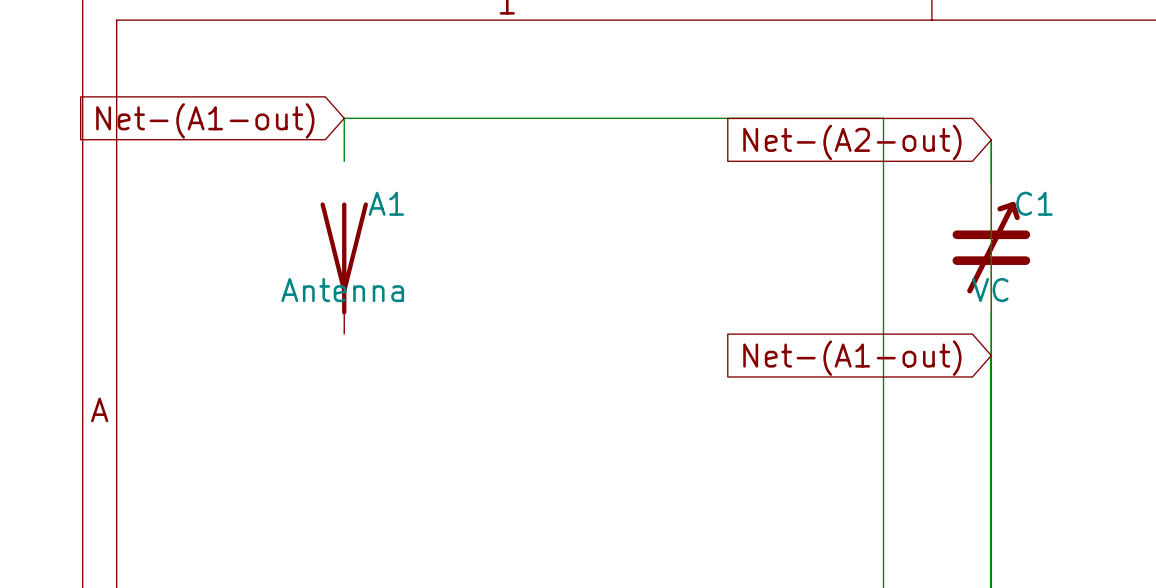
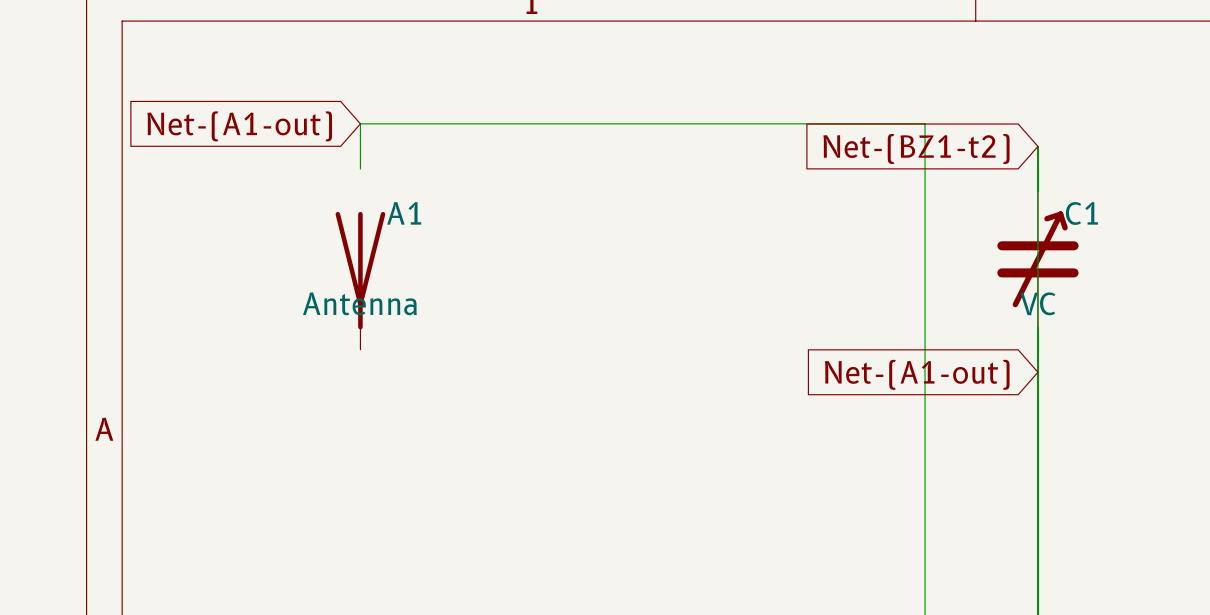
global label: Net-(A2-out) (852, 142) -> Net-(BZ1-t2) (916, 148)

